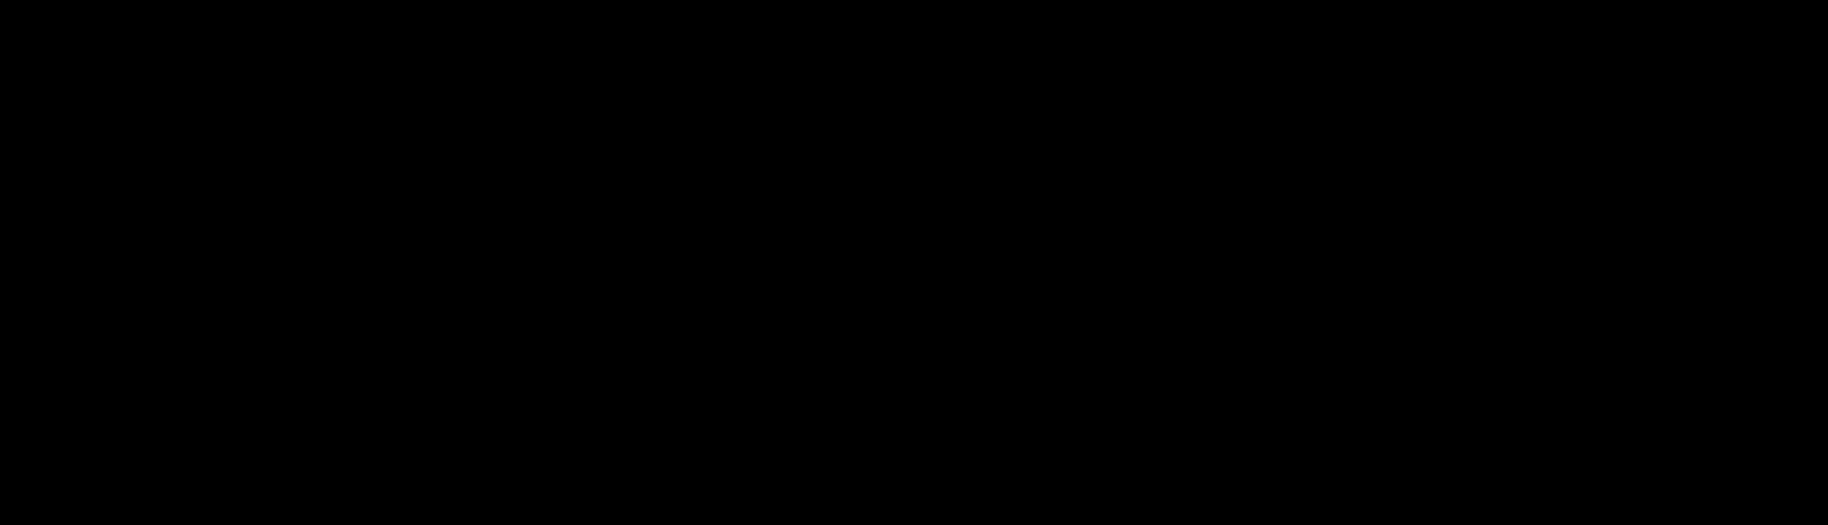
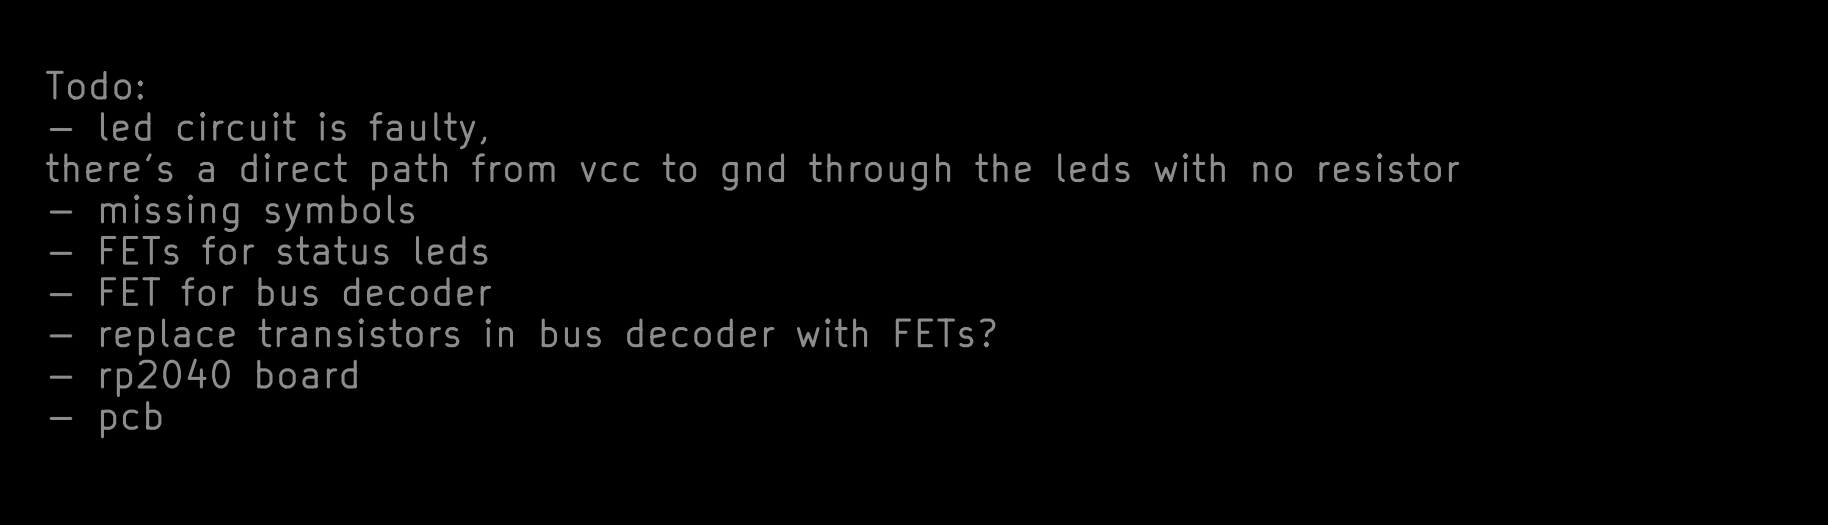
text: none -> Todo: (94, 85)
text: none -> - led circuit is faulty, (267, 130)
text: none -> there's a direct path from vcc to gnd through the leds with no resistor (752, 172)
text: none -> - missing symbols (231, 213)
text: none -> - FETs for status leds (268, 250)
text: none -> - FET for bus decoder (270, 291)
text: none -> - replace transistors in bus decoder with FETs? (522, 337)
text: none -> - rp2040 board (203, 377)
text: none -> - pcb (105, 419)

